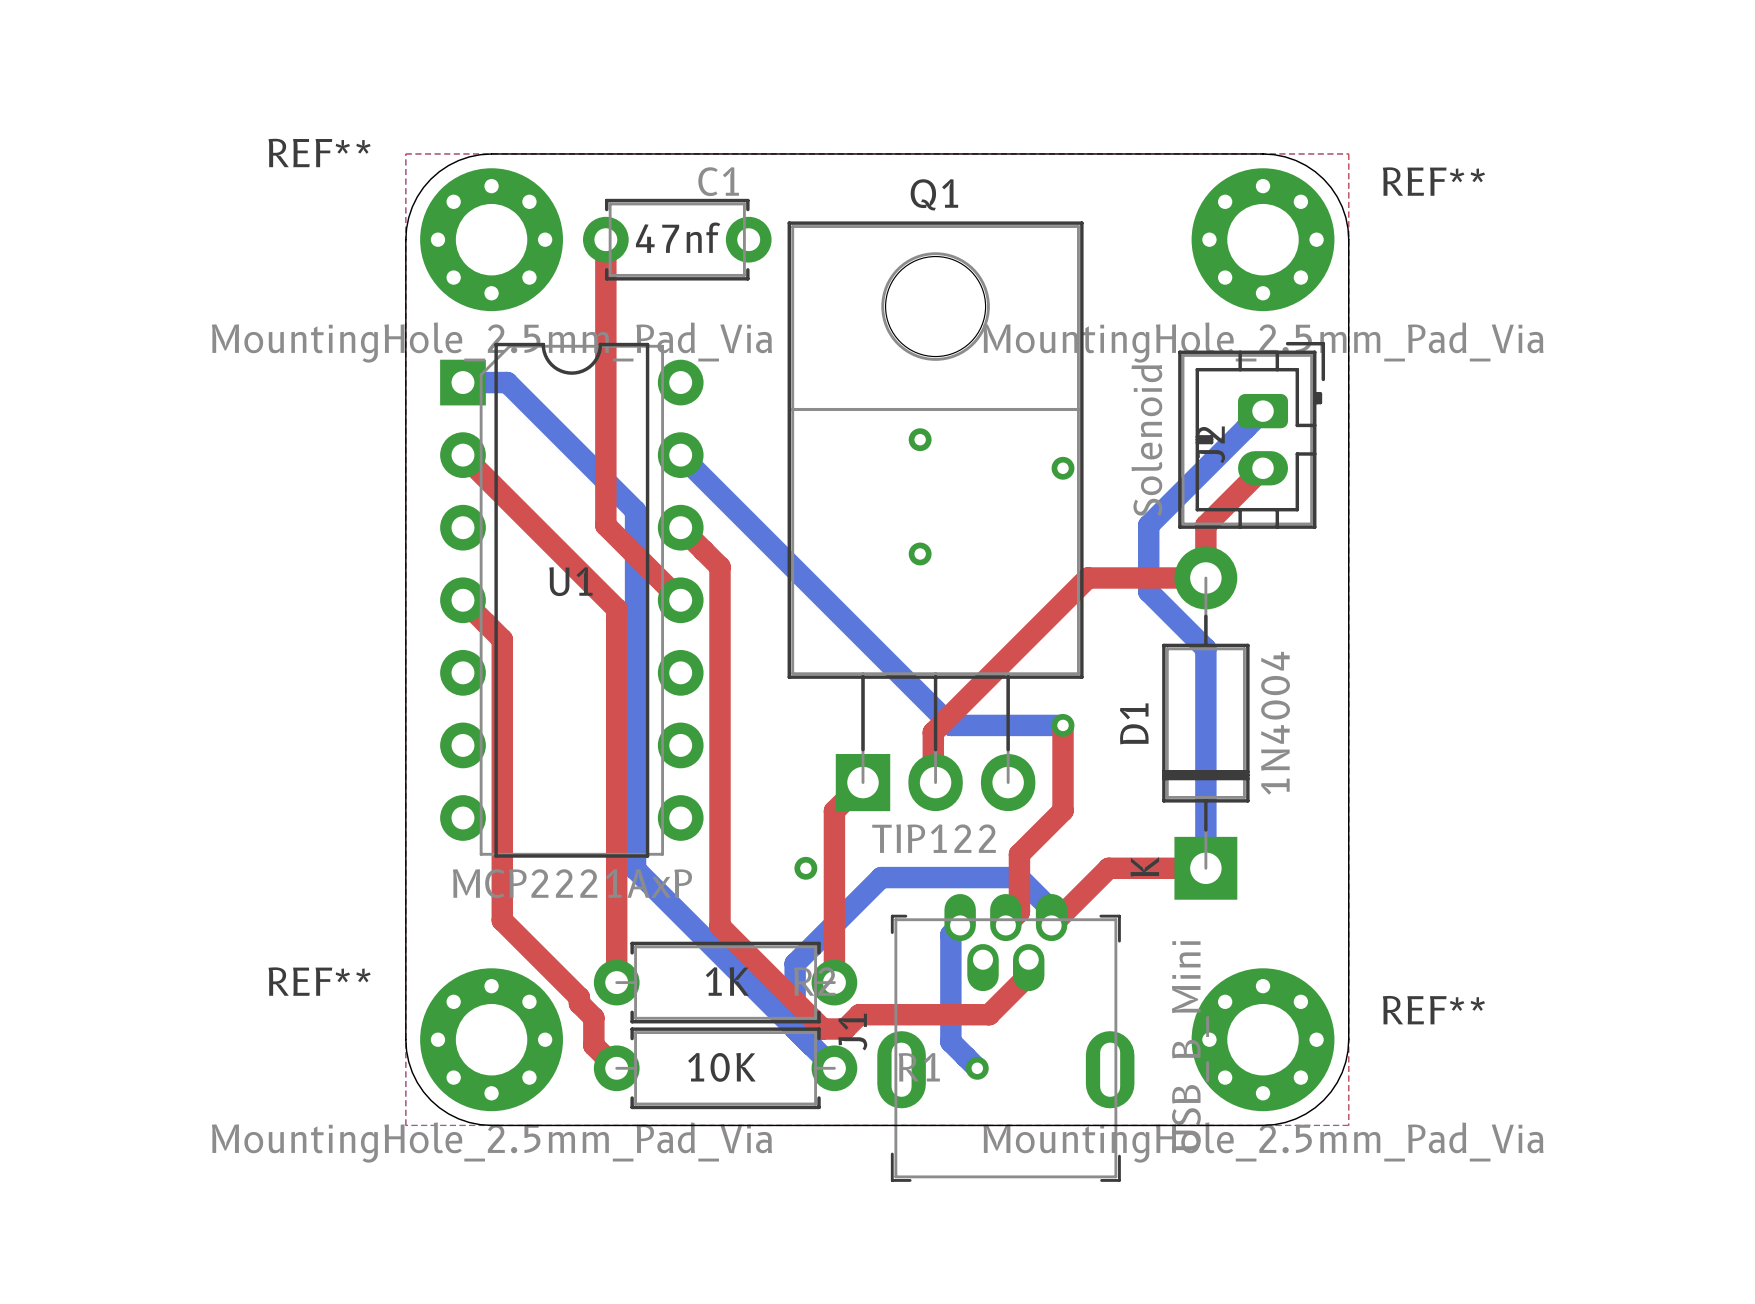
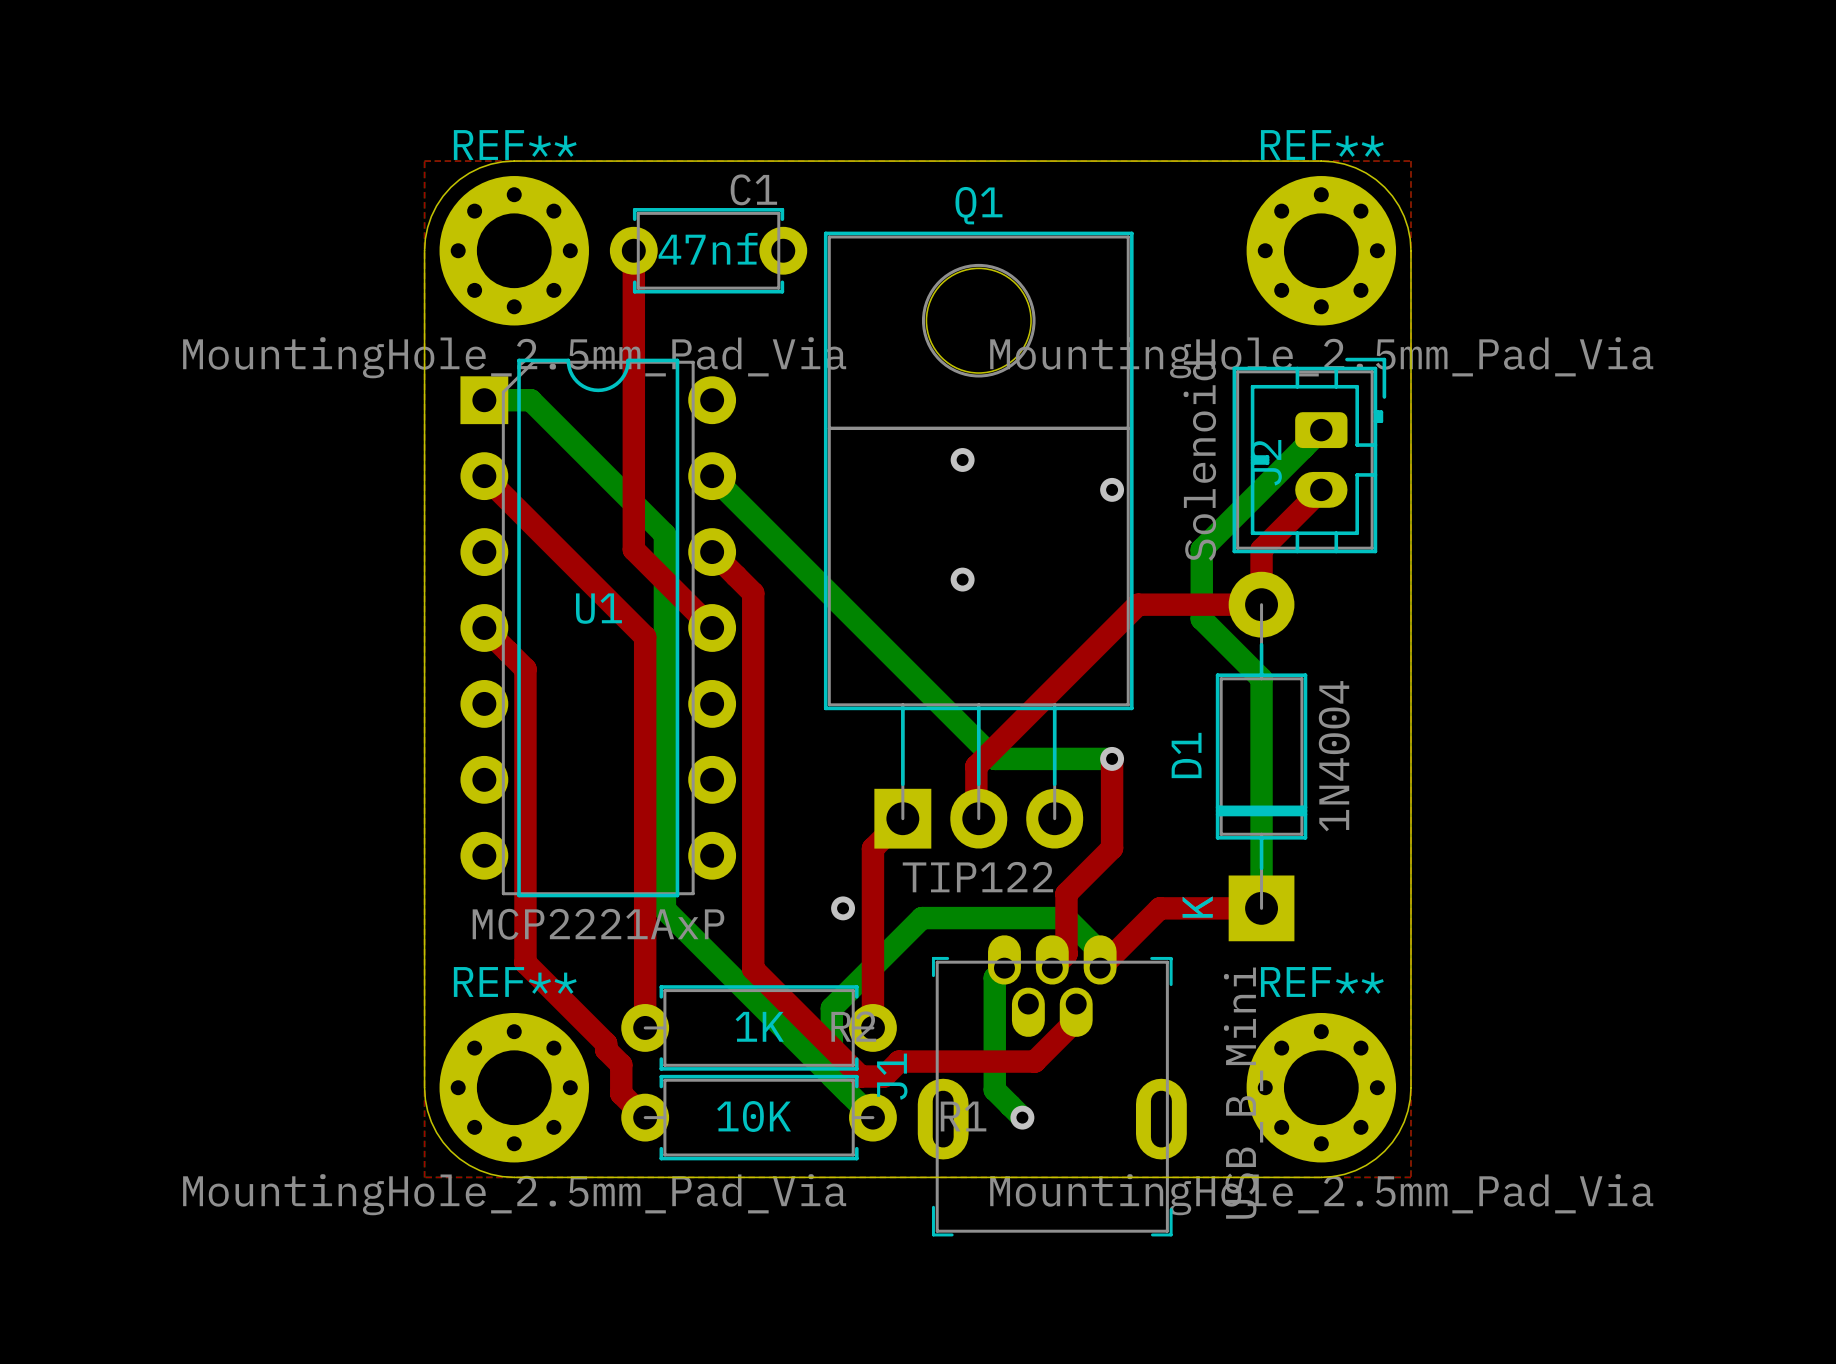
REF** name position: REF** (319, 152) -> REF** (515, 145)
REF** name position: REF** (1433, 181) -> REF** (1322, 145)
REF** name position: REF** (319, 981) -> REF** (515, 981)
REF** name position: REF** (1433, 1010) -> REF** (1322, 981)

